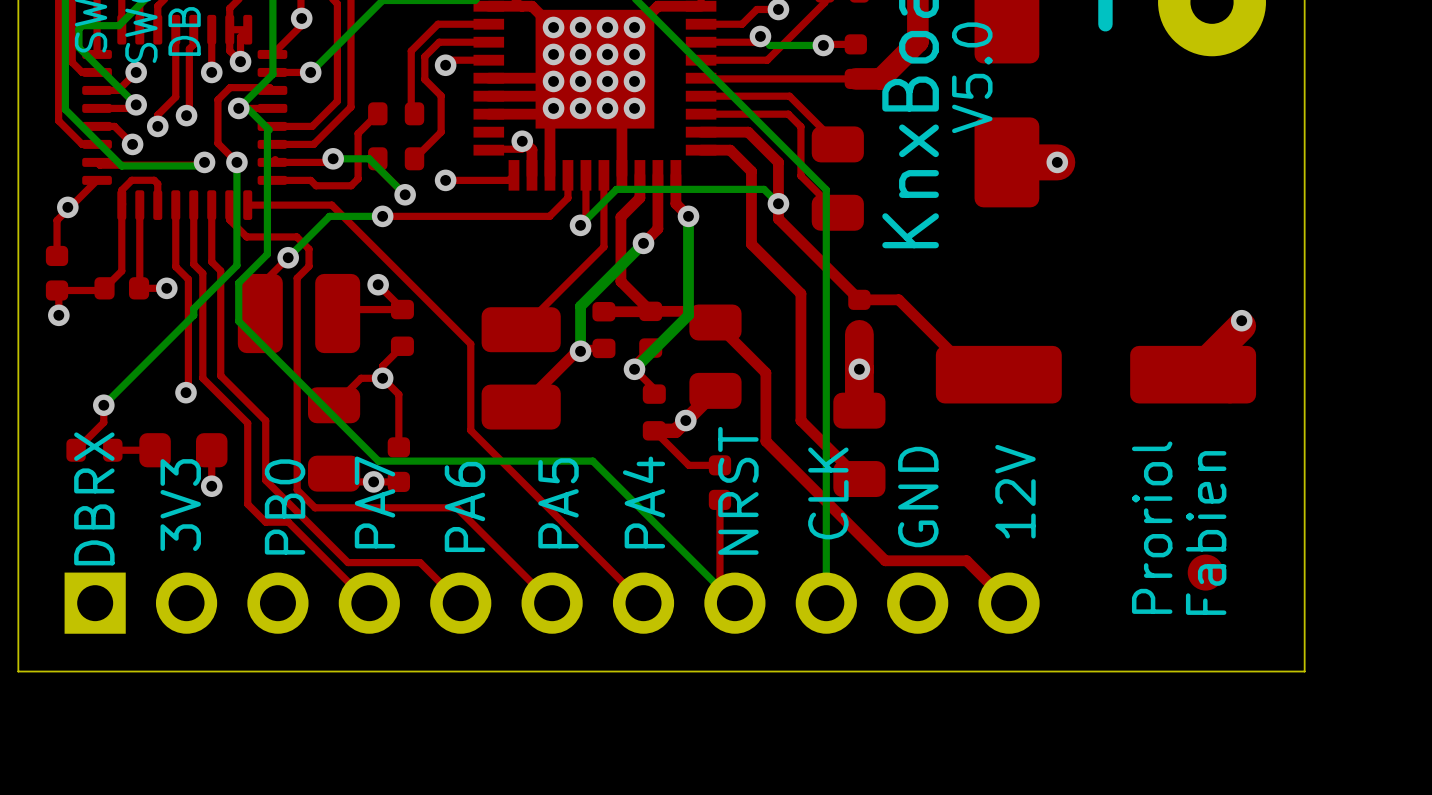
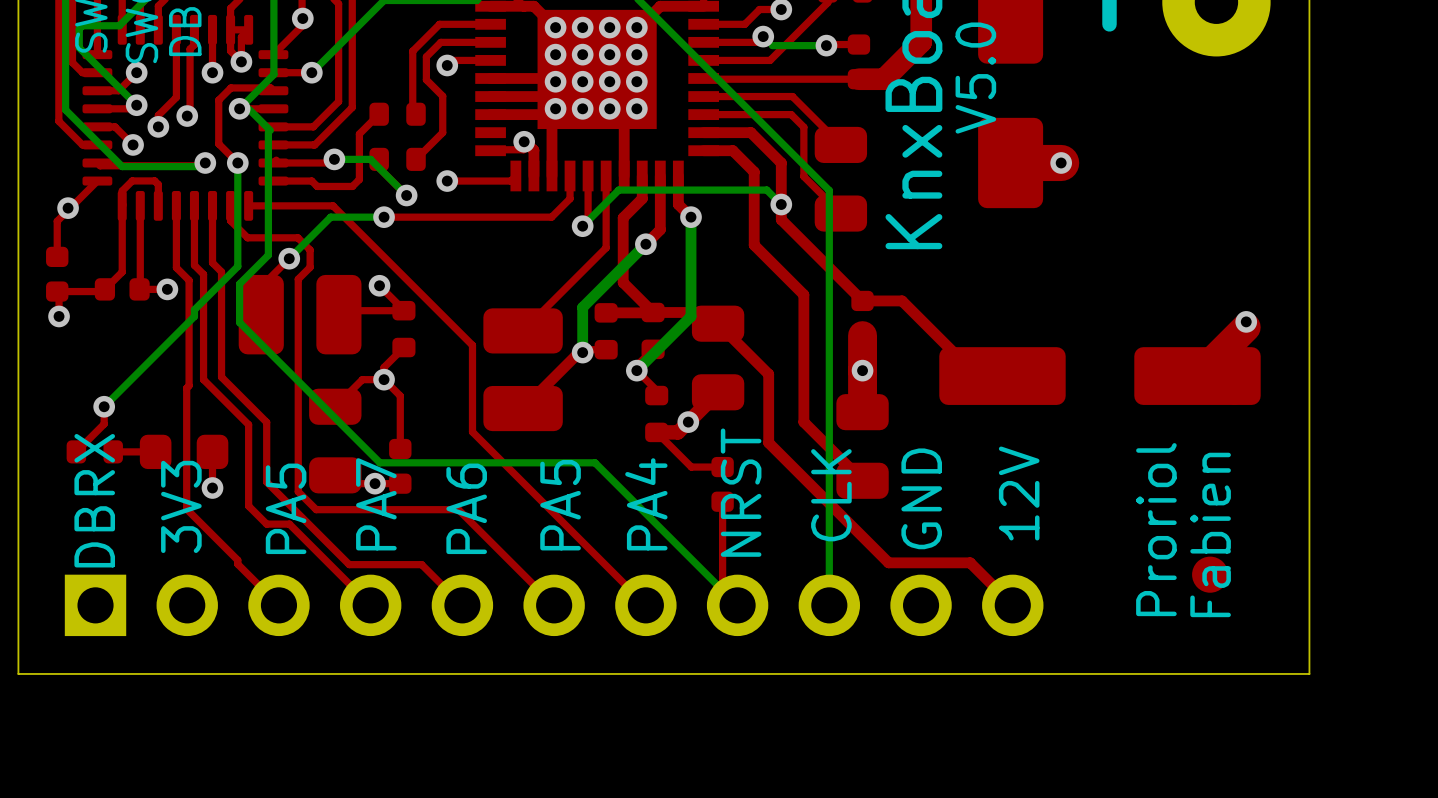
top track: none -> (186, 394) (186, 509) (237, 560) (237, 564) (278, 605)
via: (186, 392) -> none
text: PB0 (285, 506) -> PA5 (286, 508)

